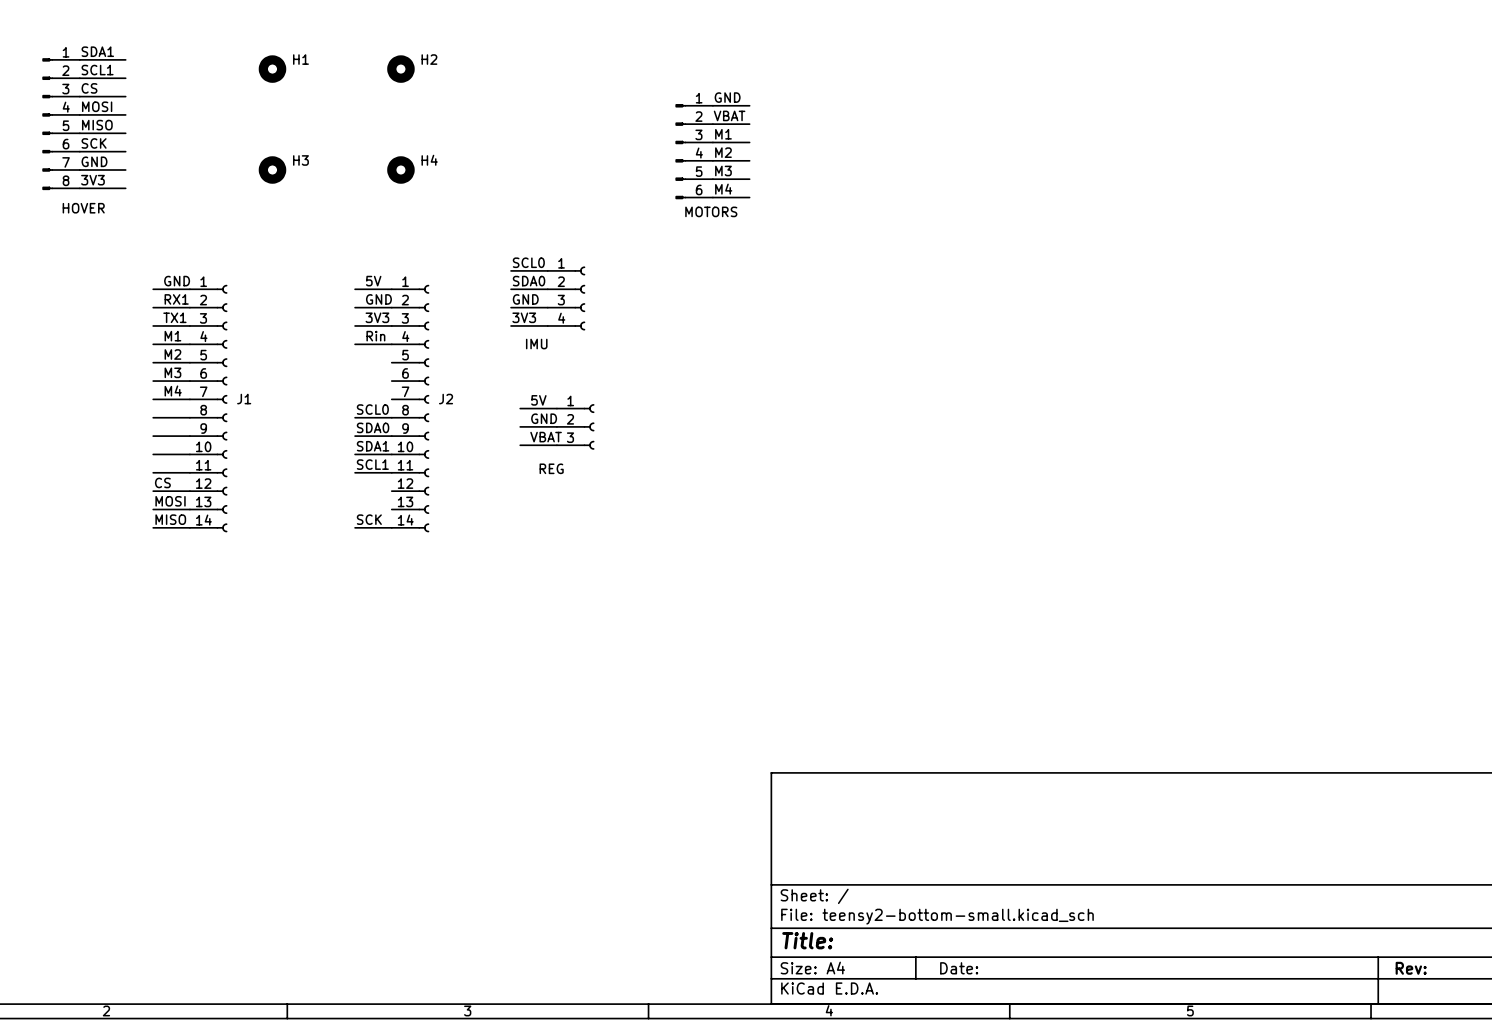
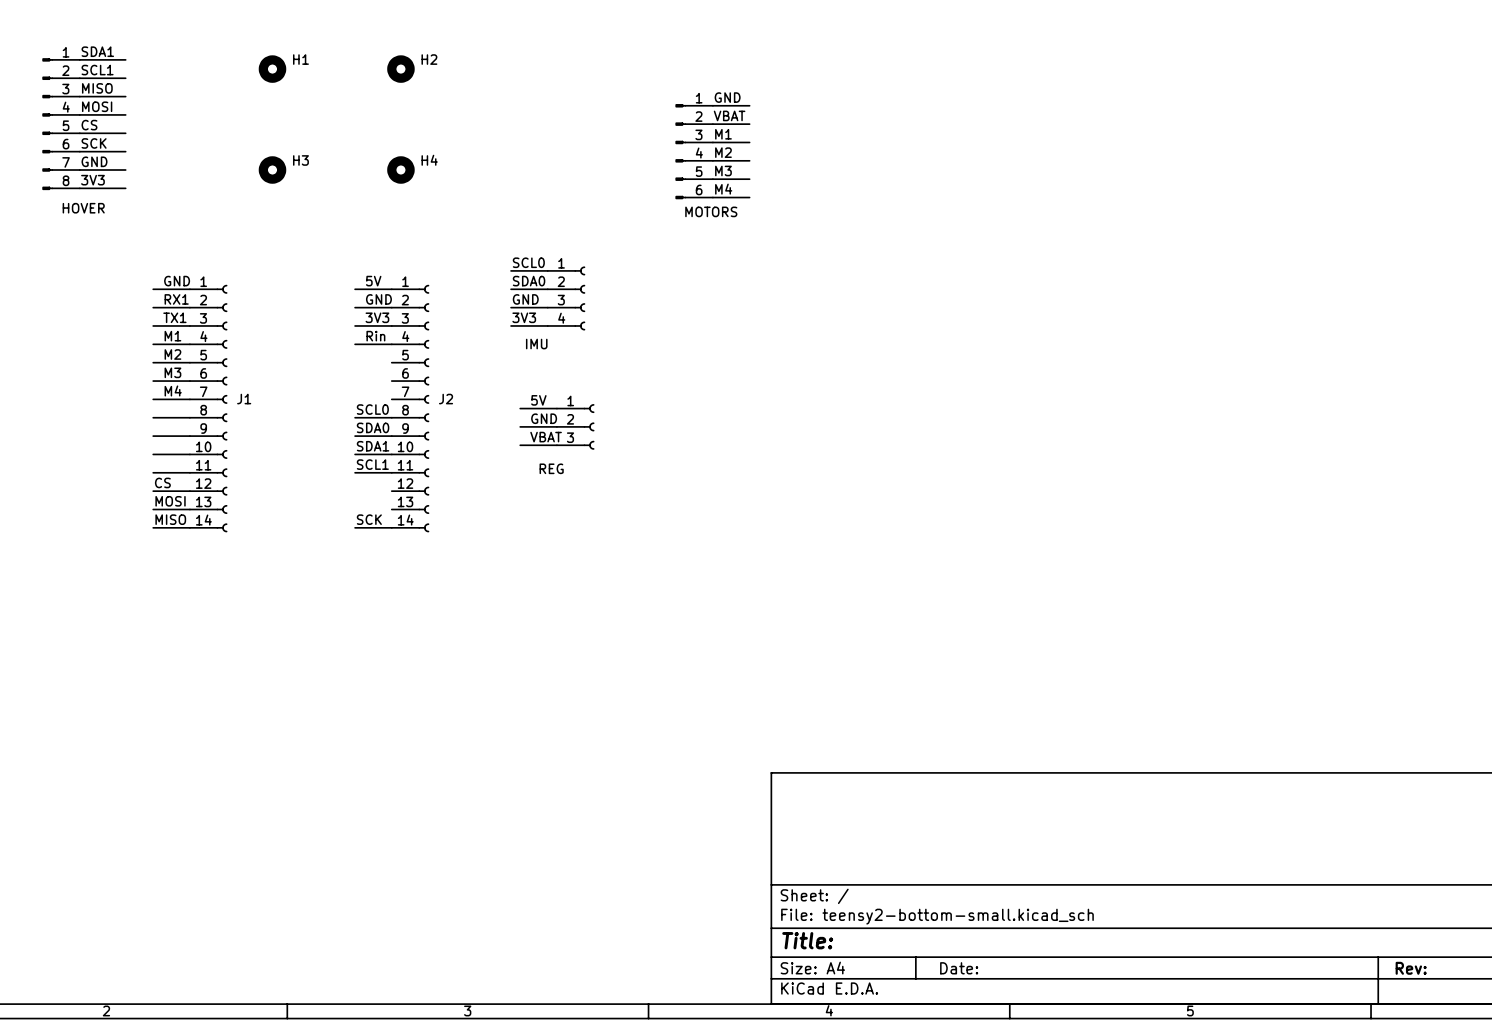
label: CS (89, 88) -> MISO (97, 88)
label: MISO (97, 125) -> CS (89, 125)

